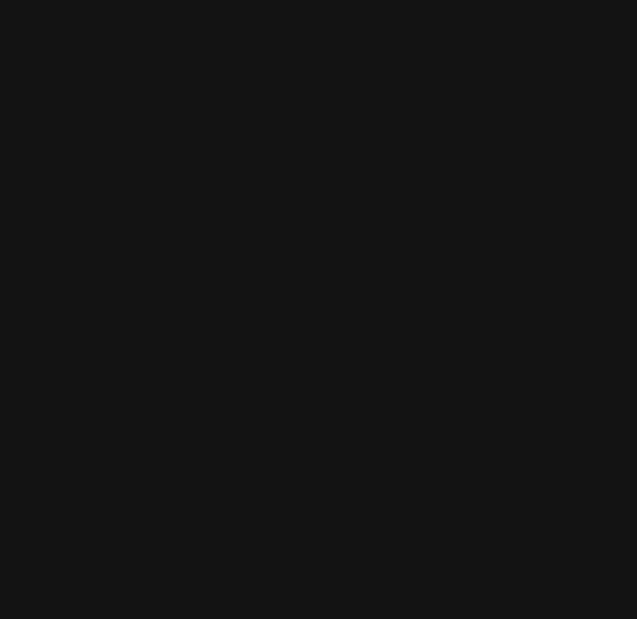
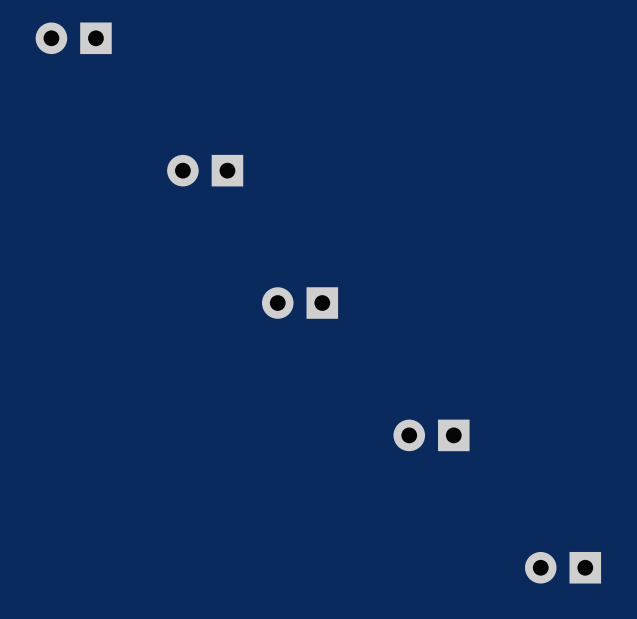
part: none -> (73, 38)
part: none -> (205, 170)
part: none -> (300, 303)
part: none -> (431, 435)
part: none -> (563, 567)

